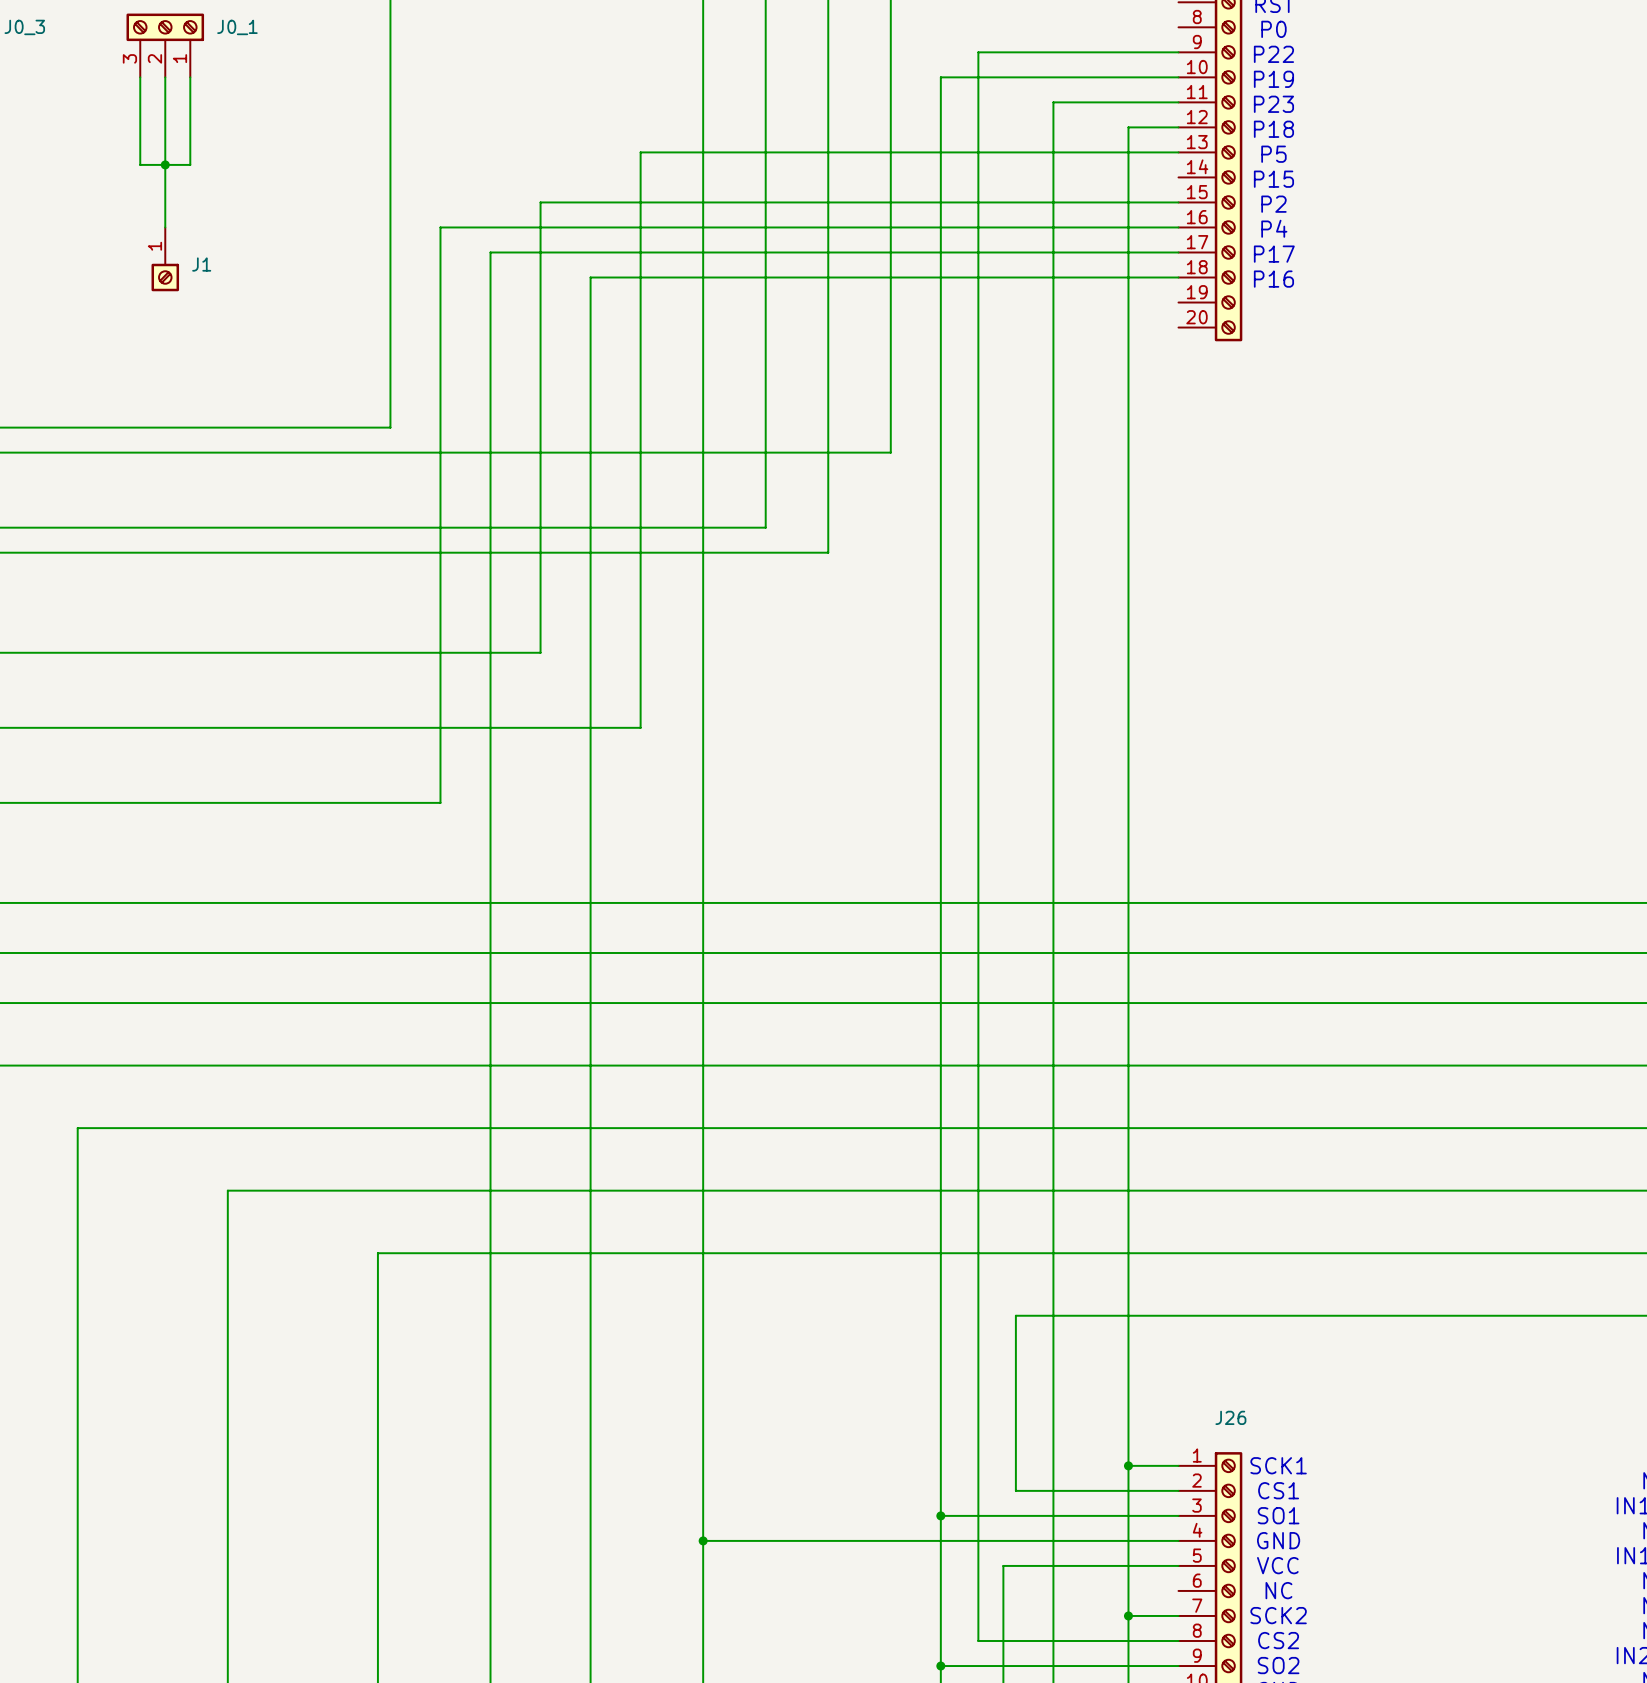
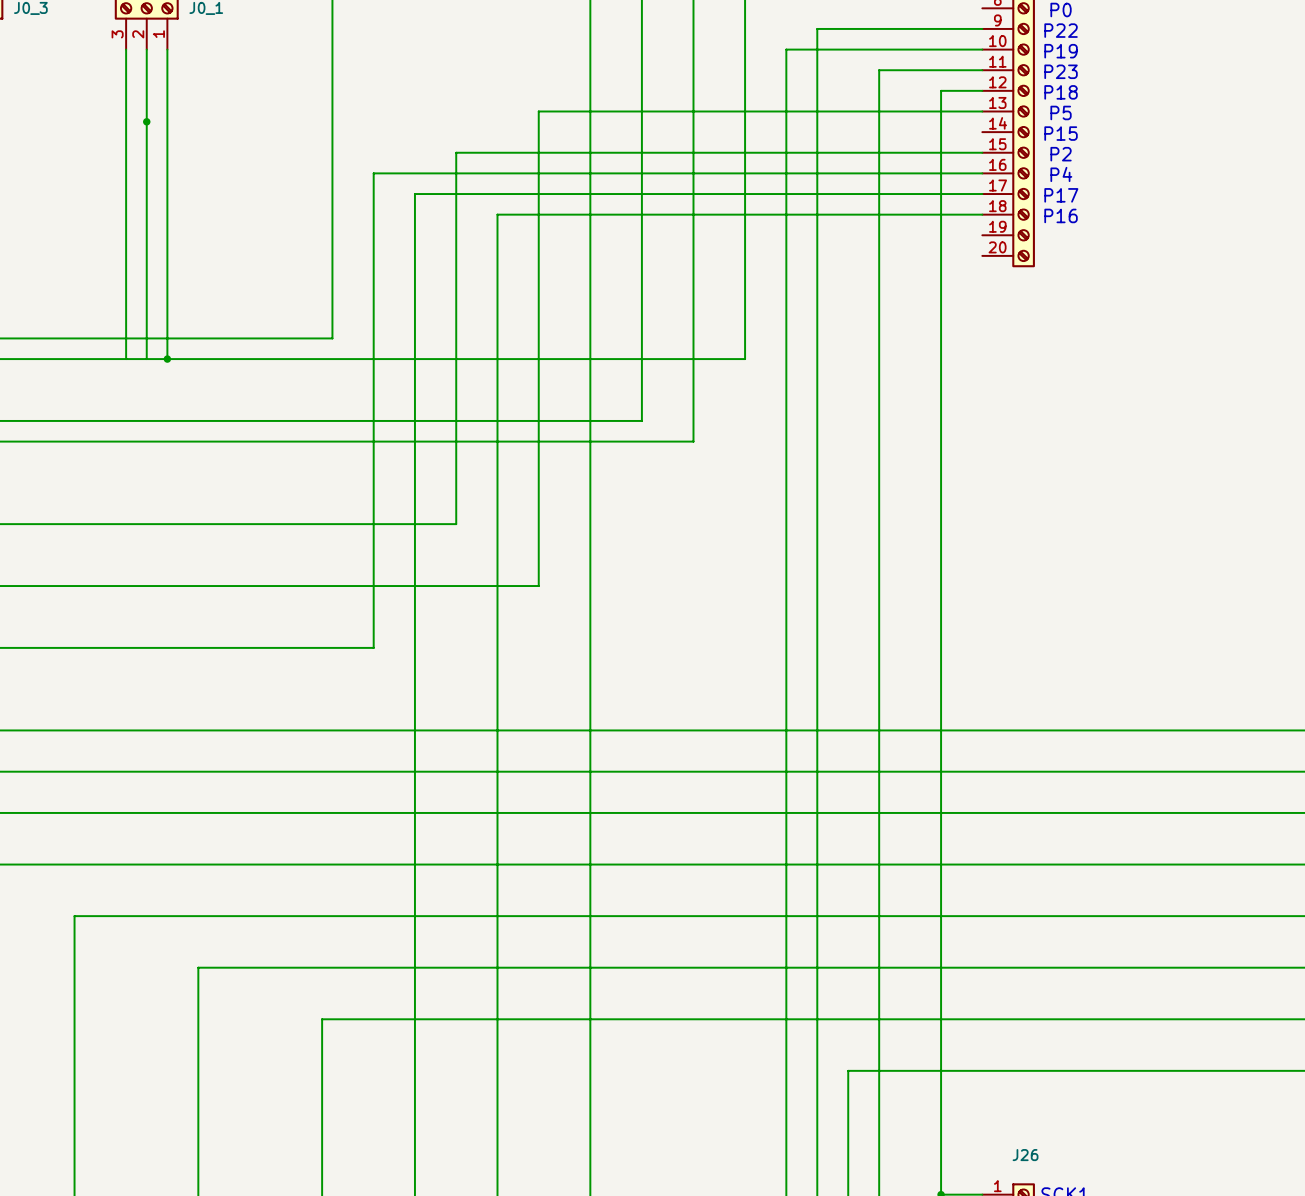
wire: (140, 164) (190, 164) -> (126, 121) (126, 359)
wire: none -> (167, 121) (167, 359)
wire: none -> (146, 173) (146, 359)
J1: (165, 259) -> none
junction: none -> (167, 359)

